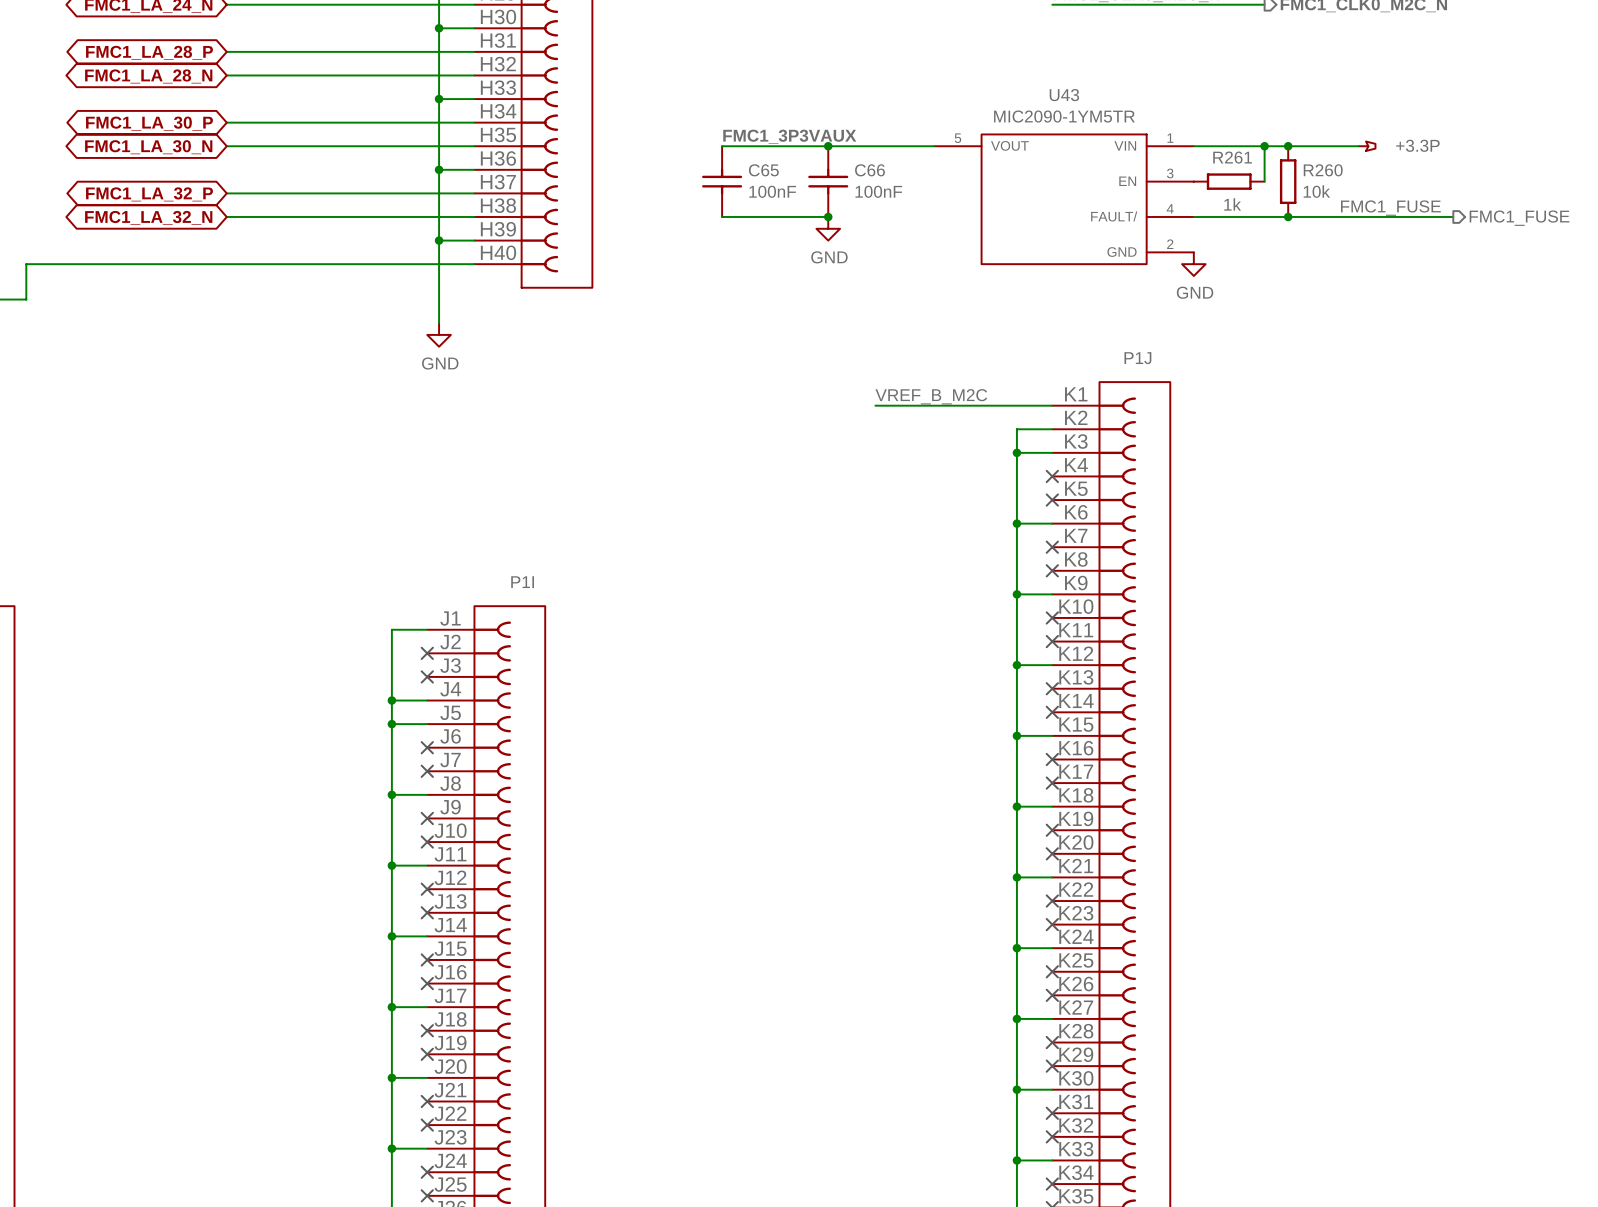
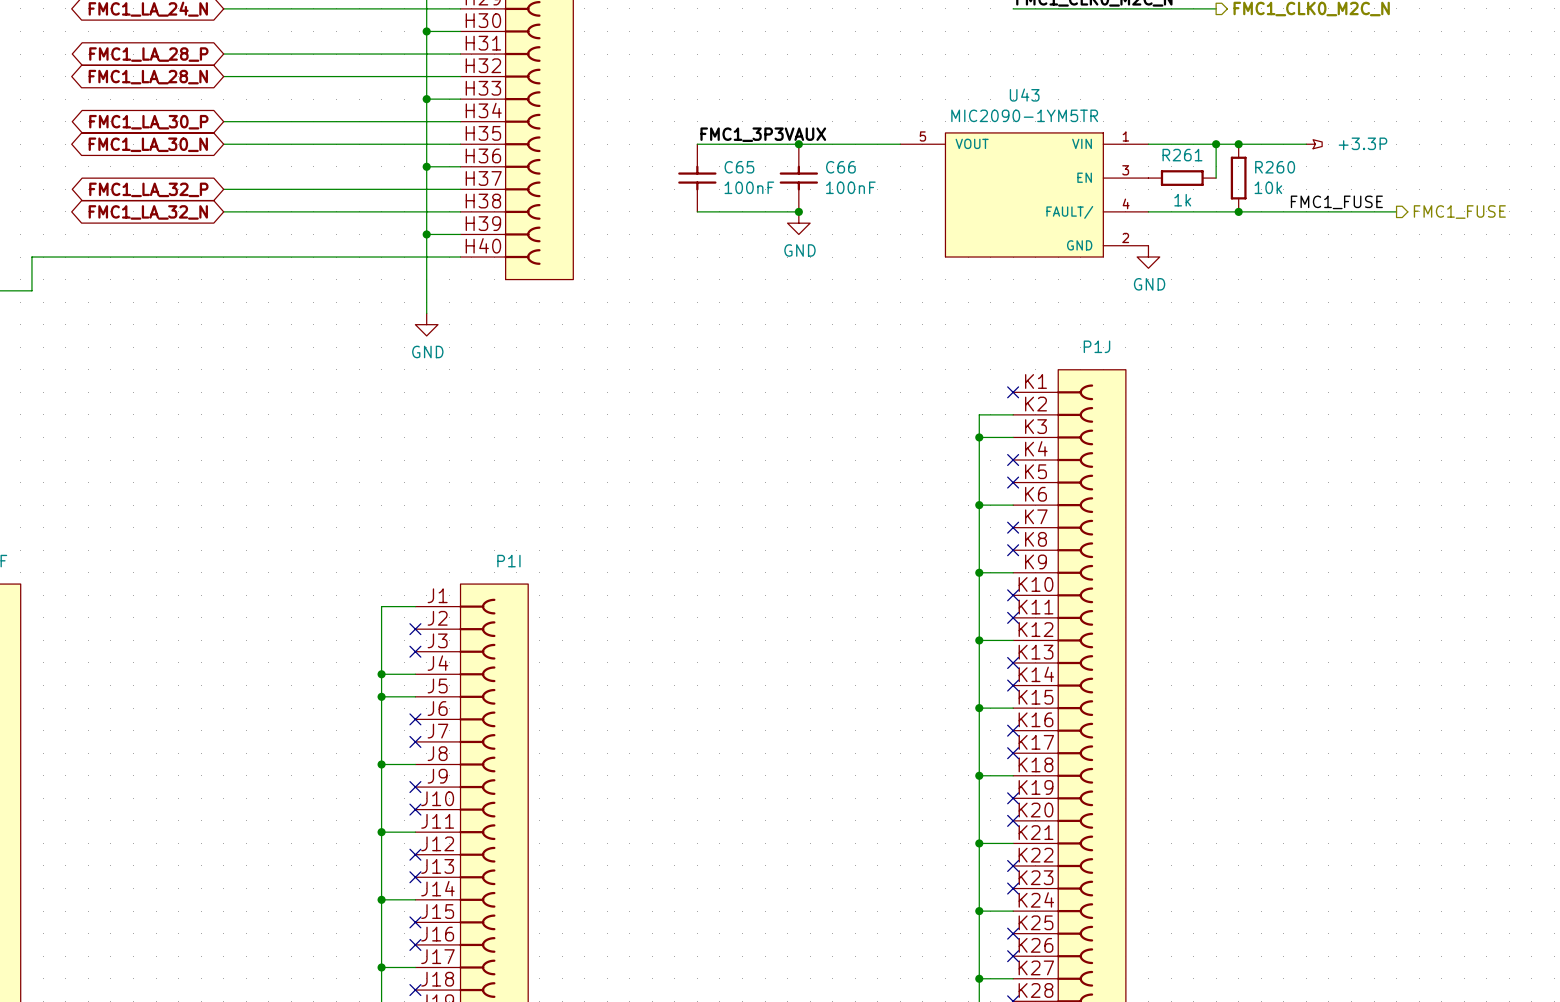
label: VREF_B_M2C (931, 396) -> none
wire: (875, 405) (1052, 405) -> none
no-connect mark: none -> (1013, 392)

